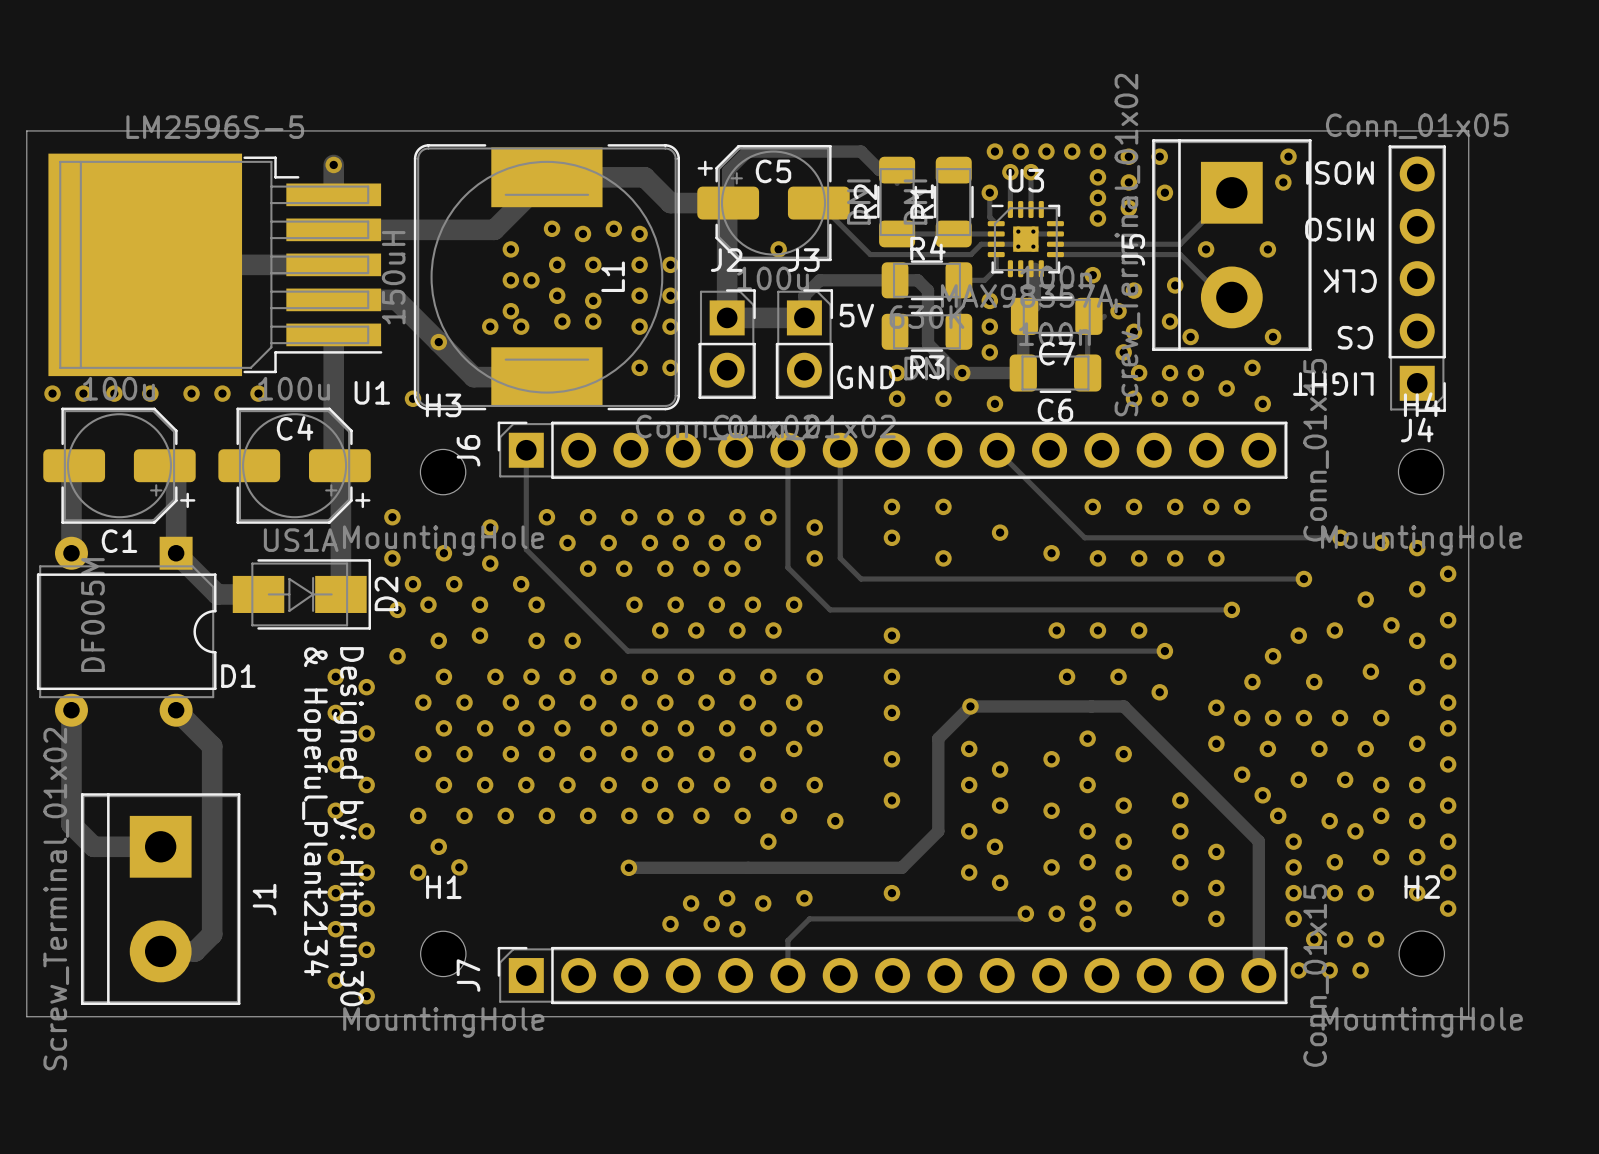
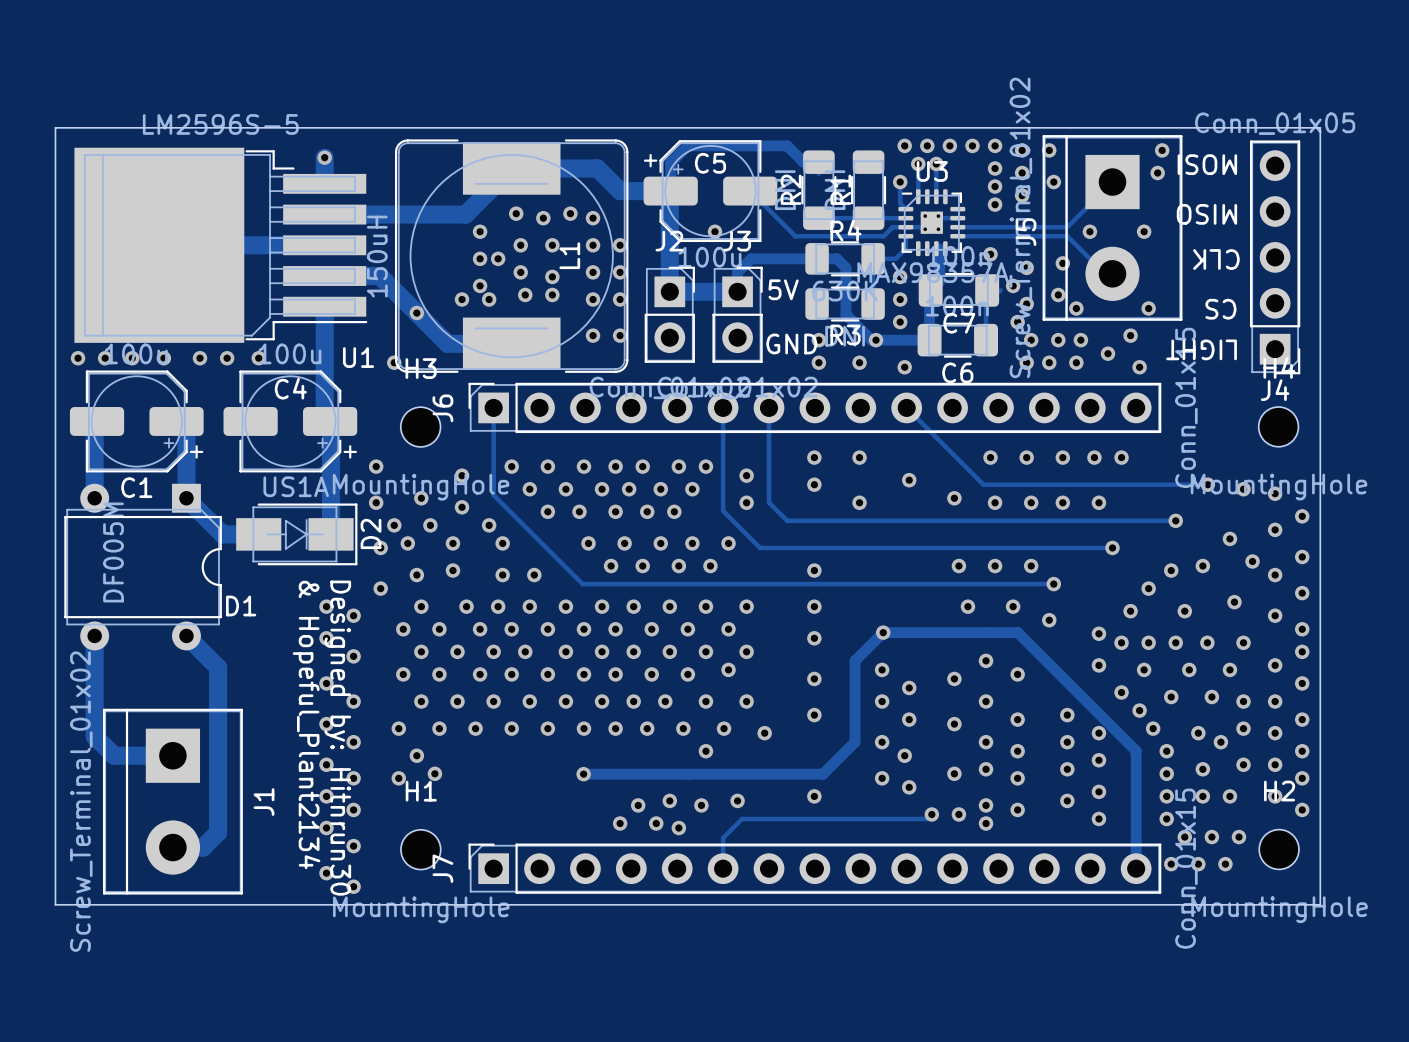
via: none -> (1098, 733)

